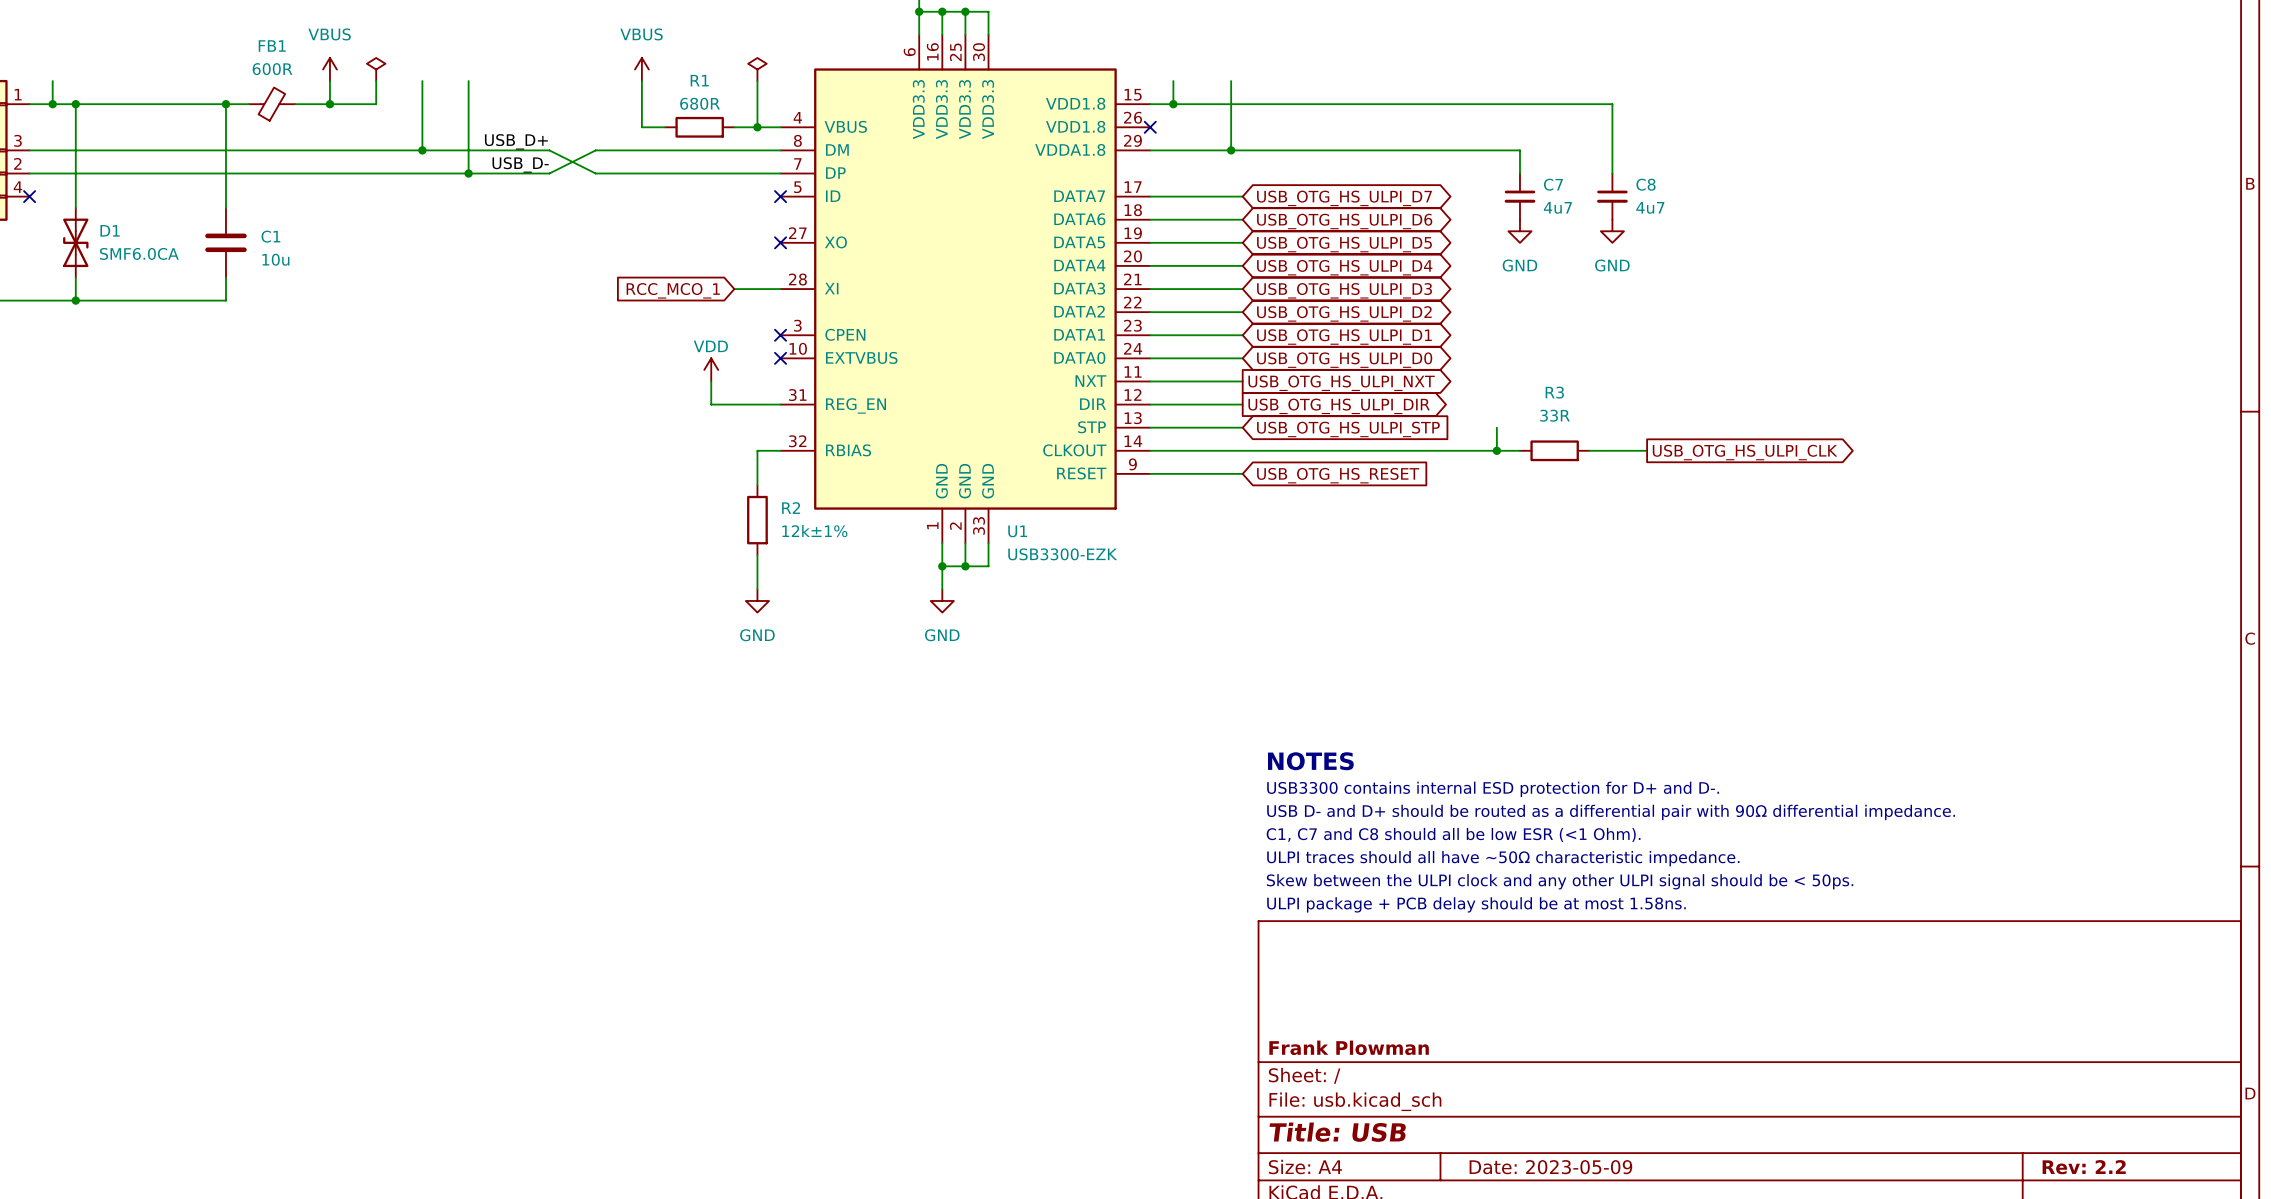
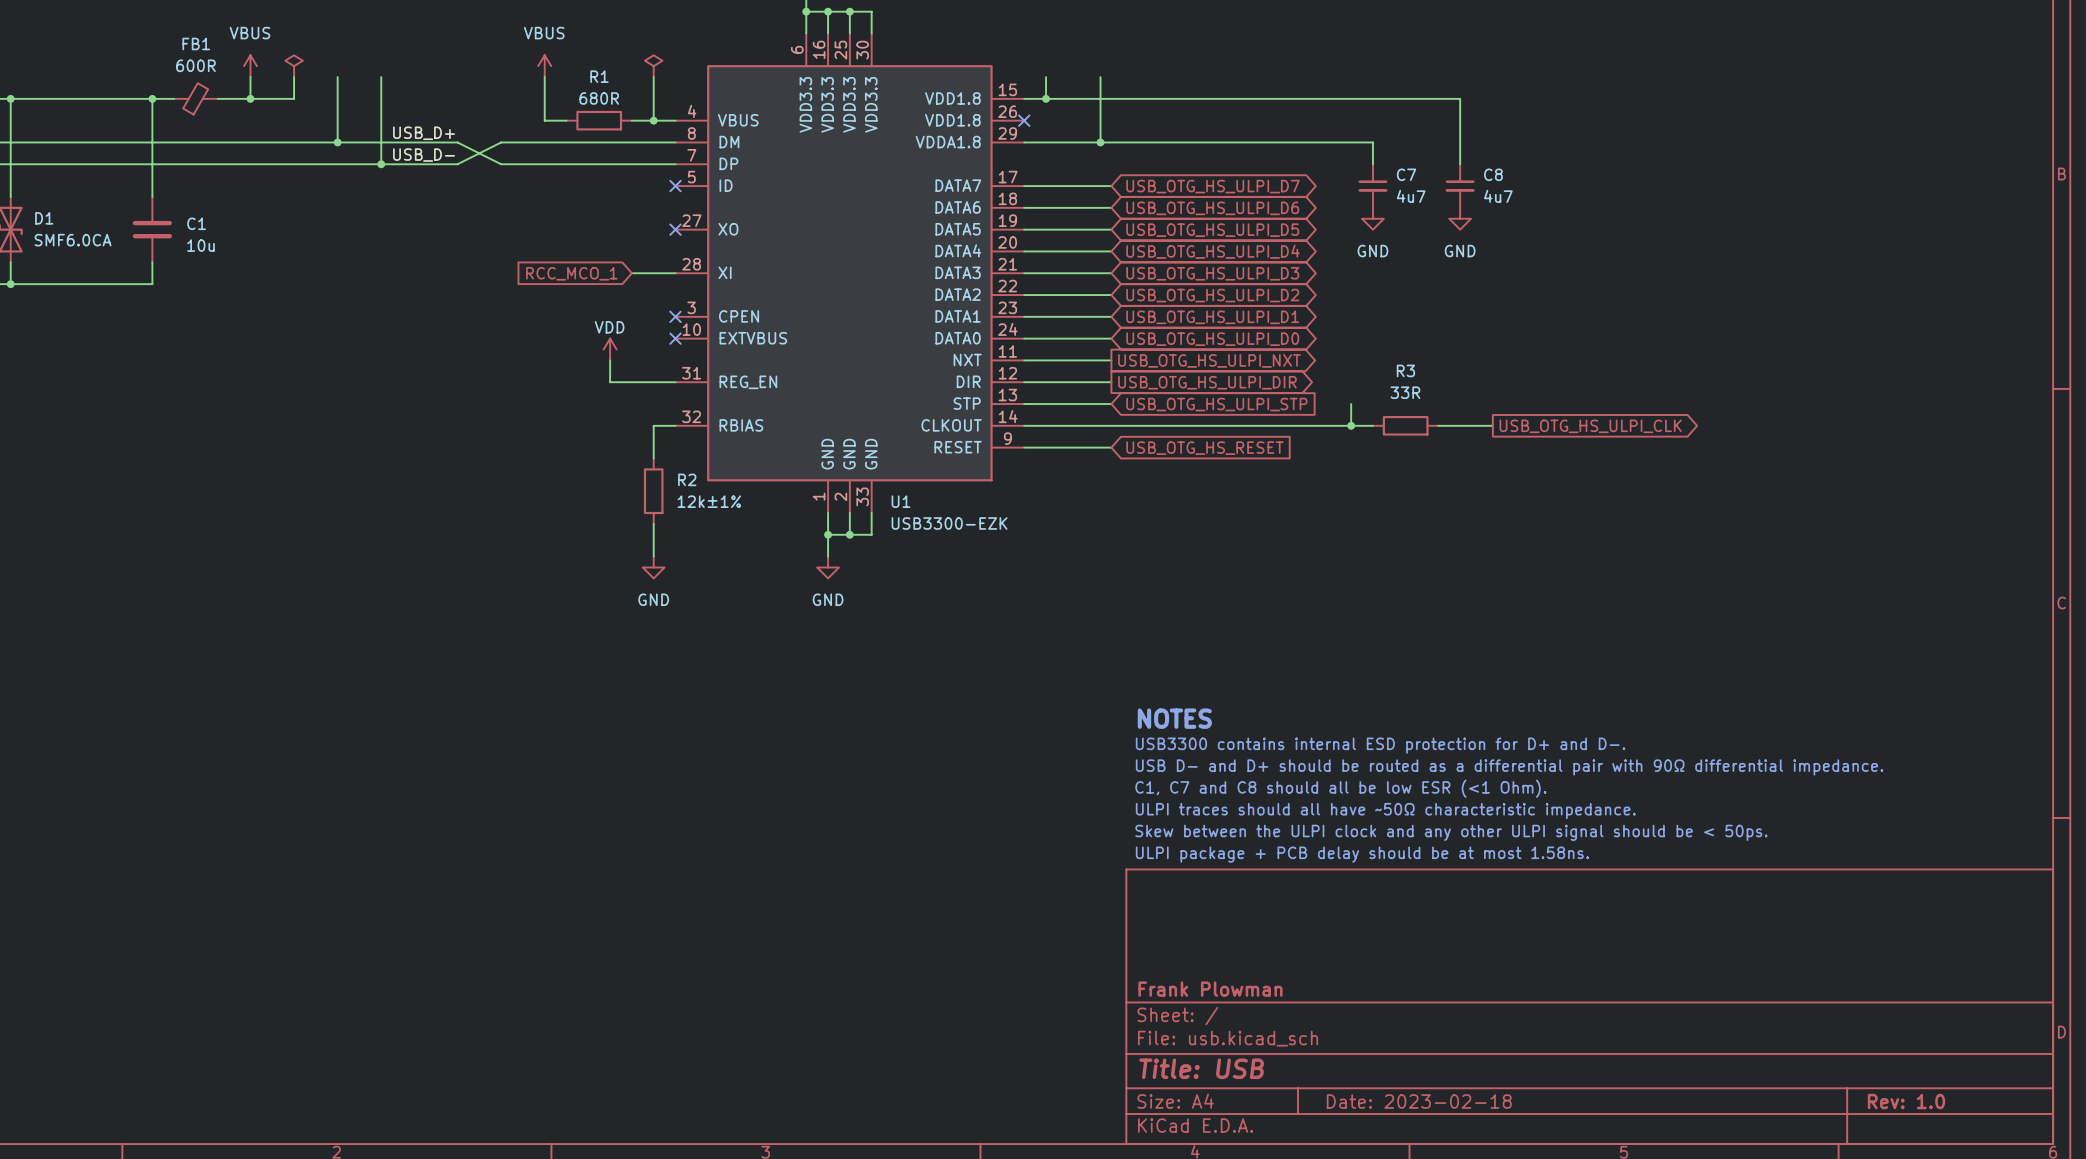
title block: Date: 2023-05-09 (1550, 1167) -> Date: 2023-02-18 (1419, 1101)
title block: Rev: 2.2 (2084, 1167) -> Rev: 1.0 (1906, 1101)

